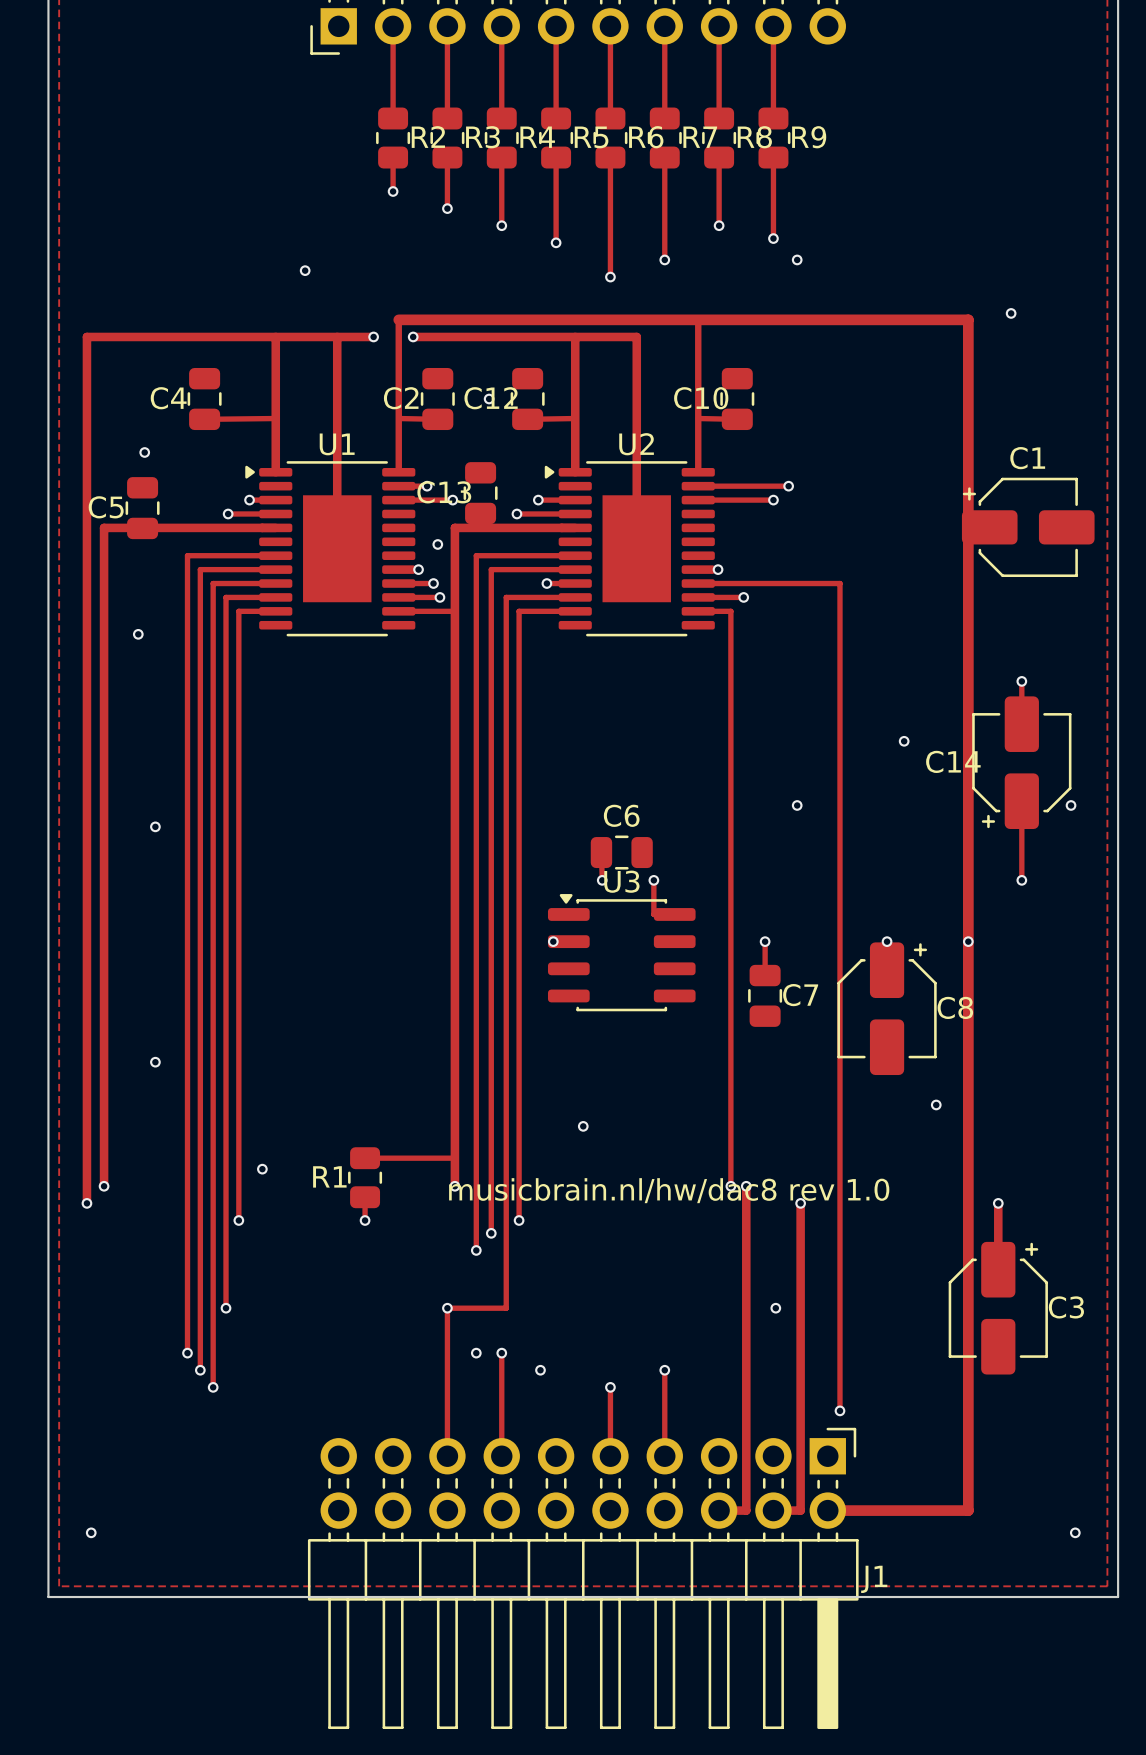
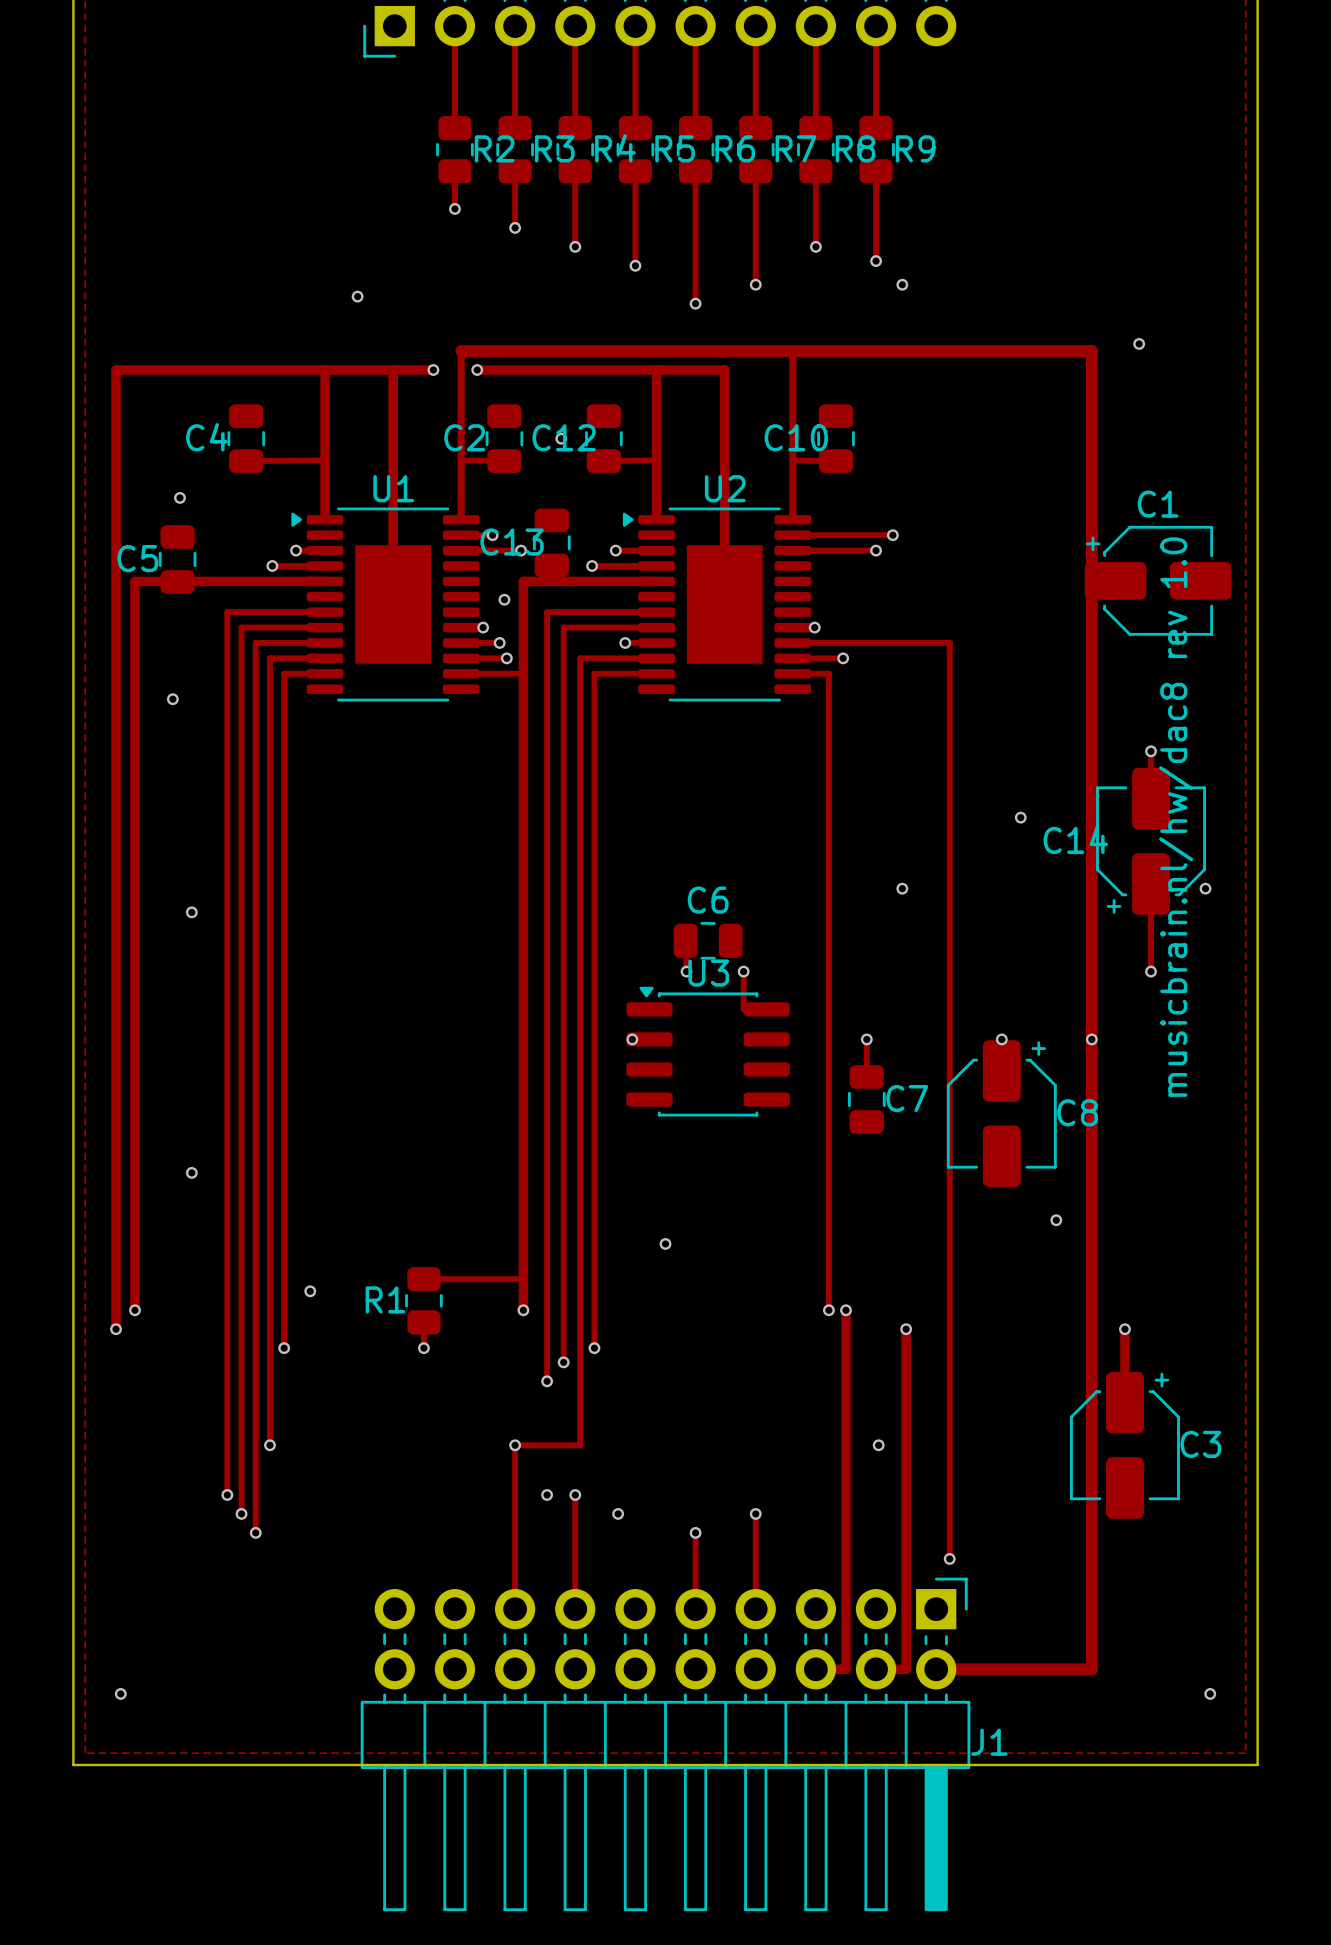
text: none -> musicbrain.nl/hw/dac8 rev 1.0 (1176, 817)
text: musicbrain.nl/hw/dac8 rev 1.0 (669, 1190) -> none

